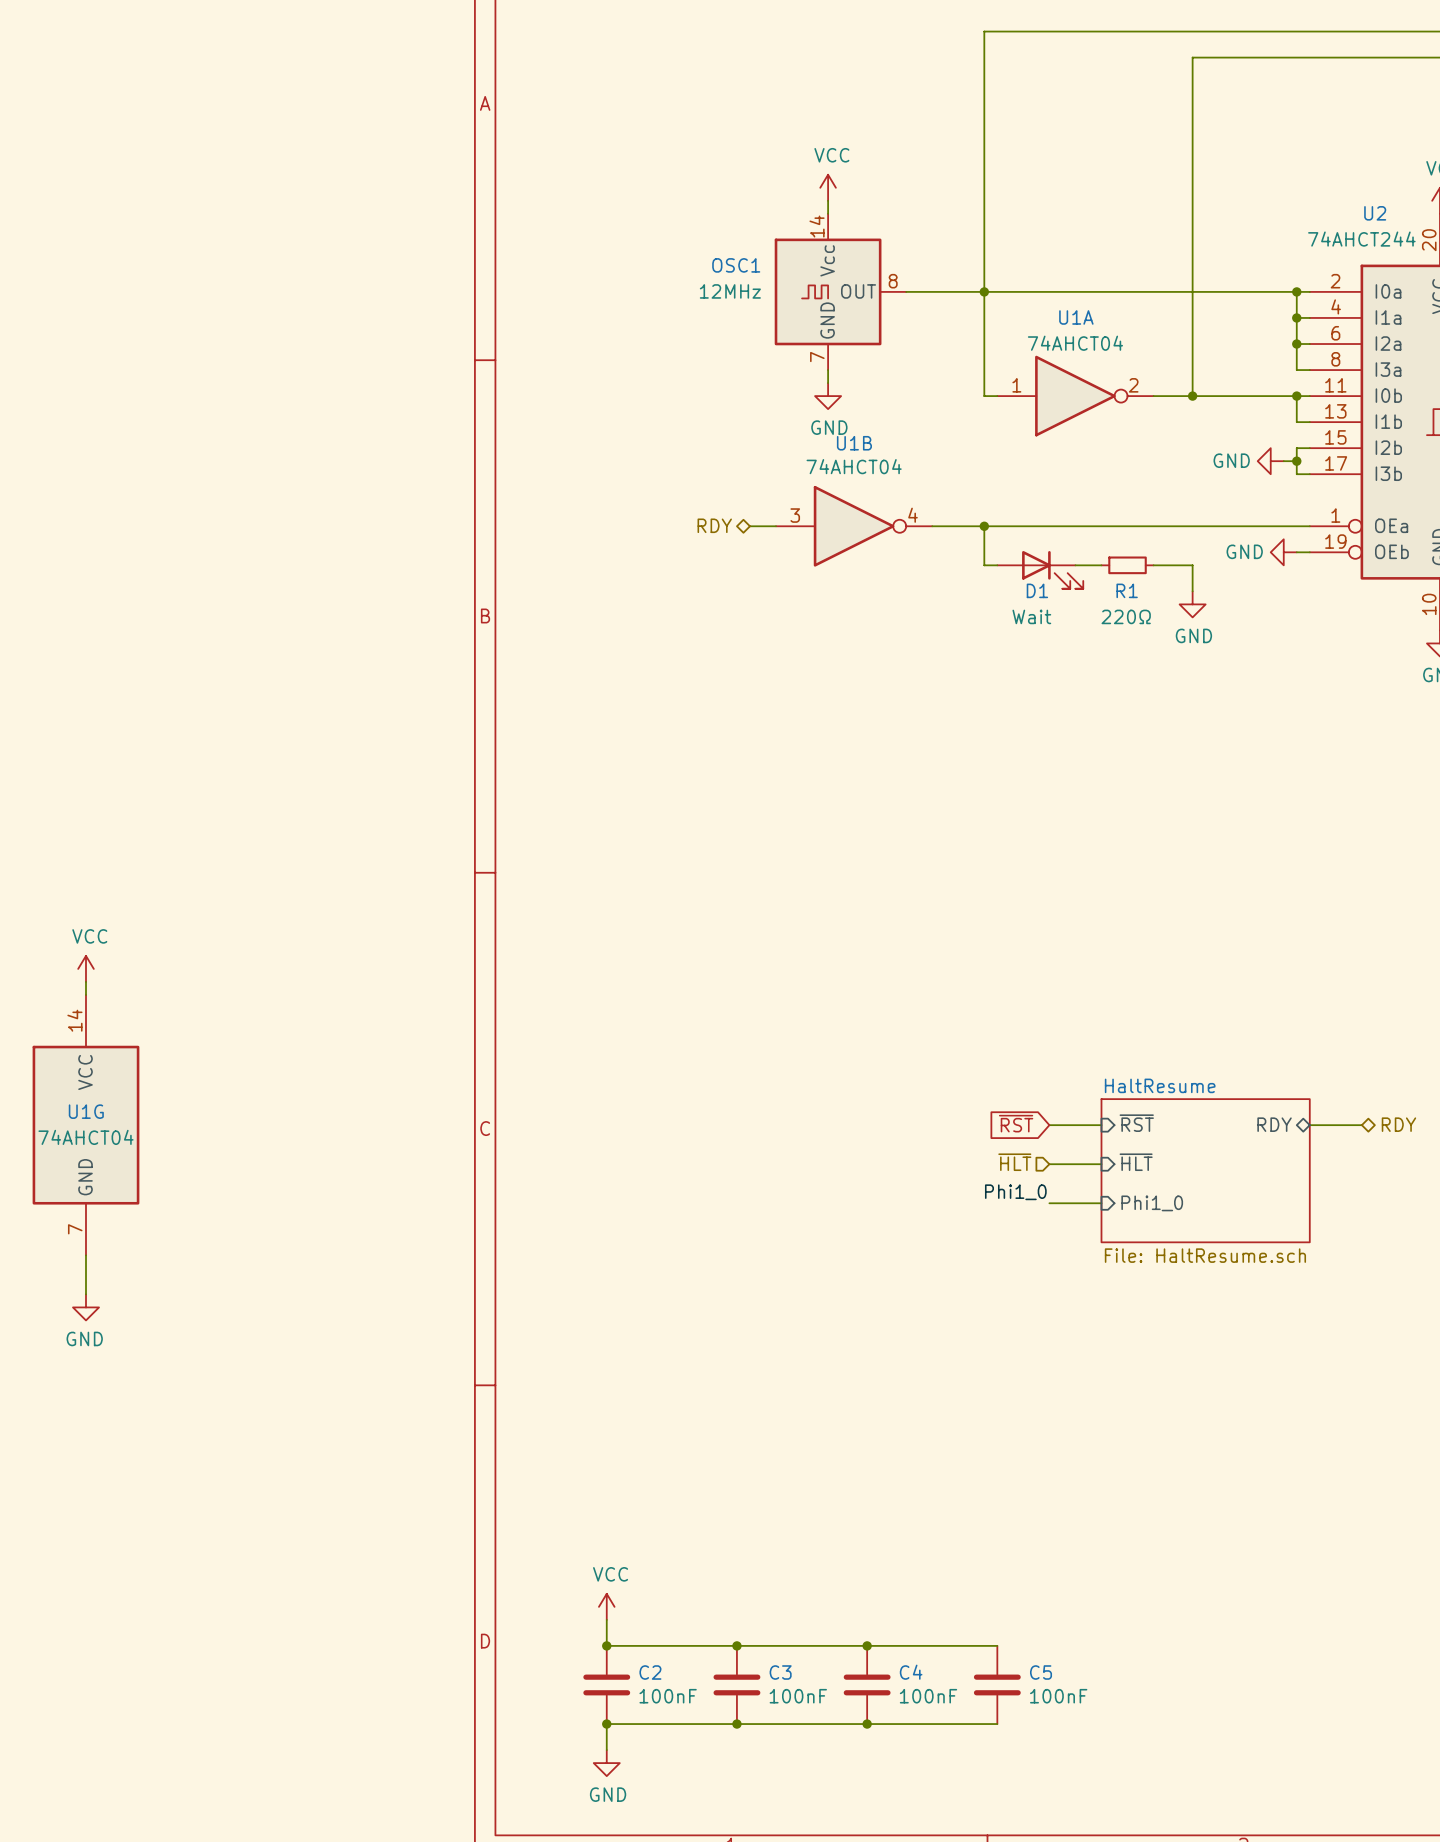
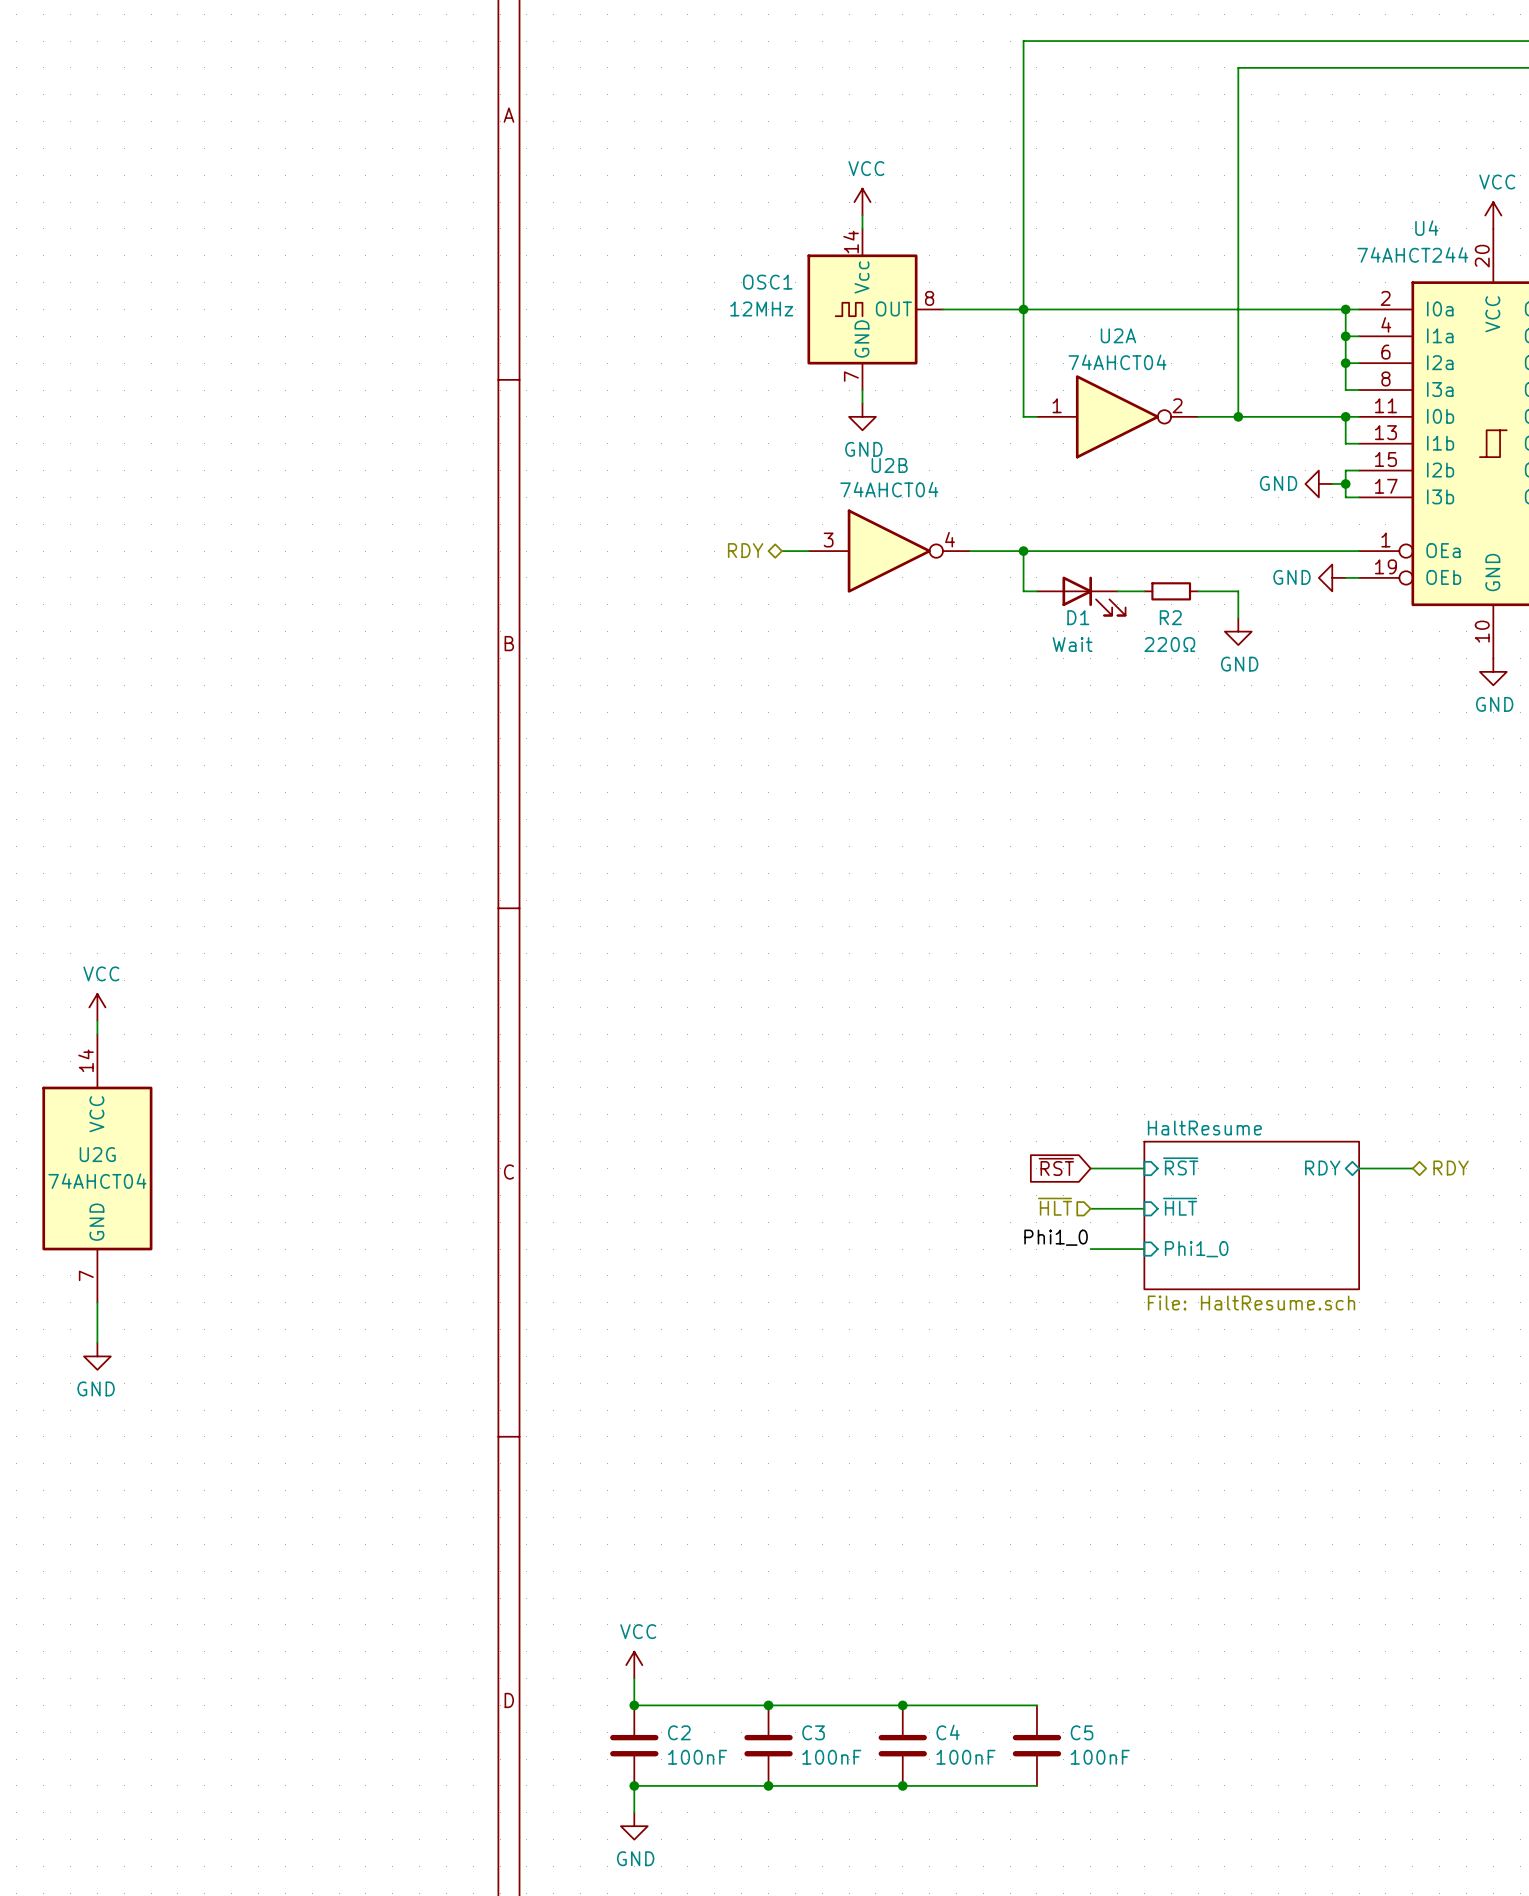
U2 name: U2 (1375, 213) -> U4 (1426, 228)
U1A name: U1A (1076, 317) -> U2A (1118, 335)
U1B name: U1B (854, 443) -> U2B (889, 465)
R1 name: R1 (1127, 590) -> R2 (1170, 617)
U1G name: U1G (86, 1111) -> U2G (97, 1154)

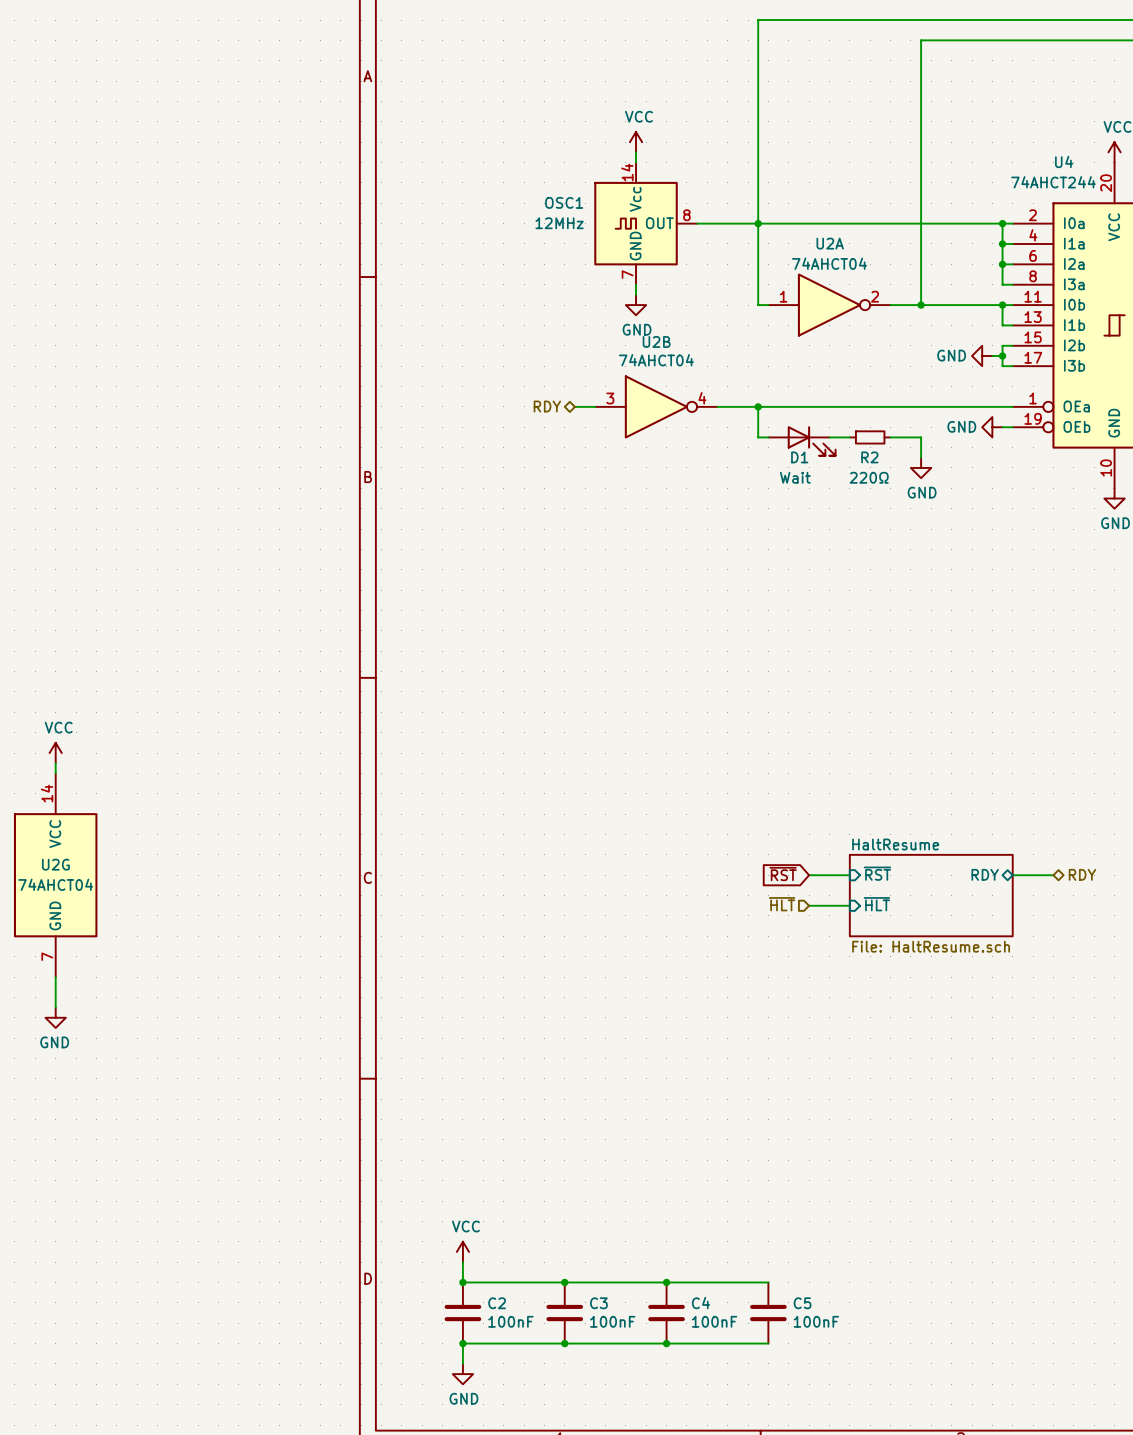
sheet HaltResume: none -> File: HaltResume.sch (931, 895)
sheet HaltResume: File: HaltResume.sch (1251, 1215) -> none
label: Phi1_0 (1056, 1237) -> none
wire: (1090, 1249) (1144, 1249) -> none
sheet pin: Phi1_0 (1196, 1249) -> none

